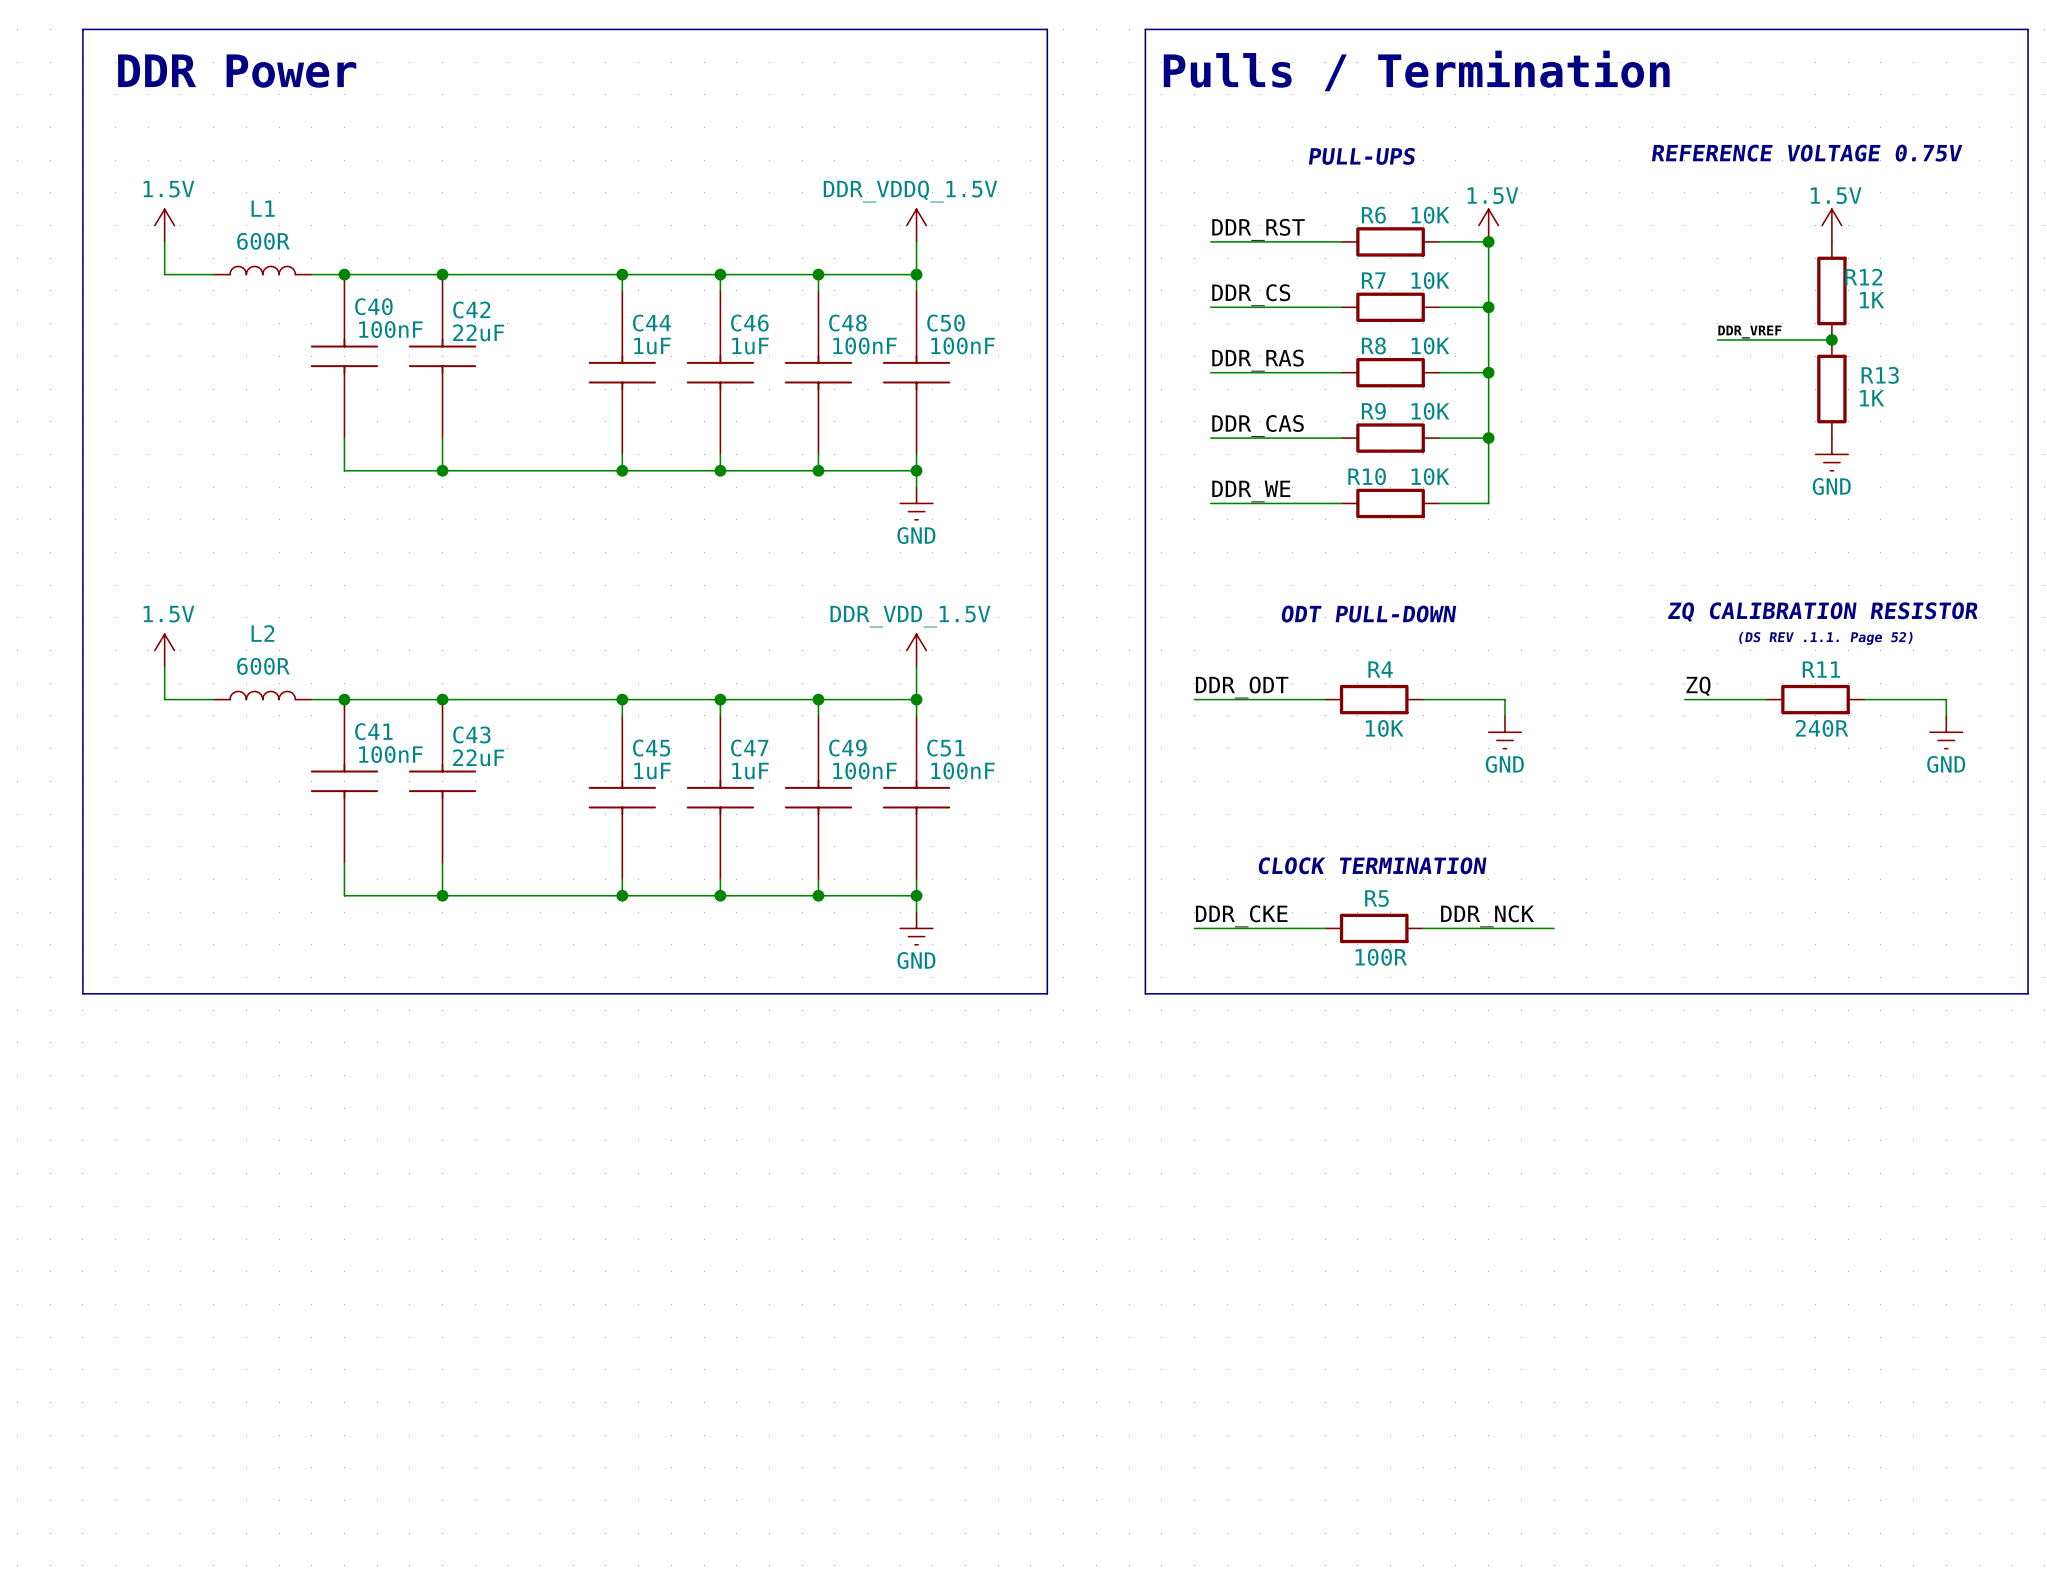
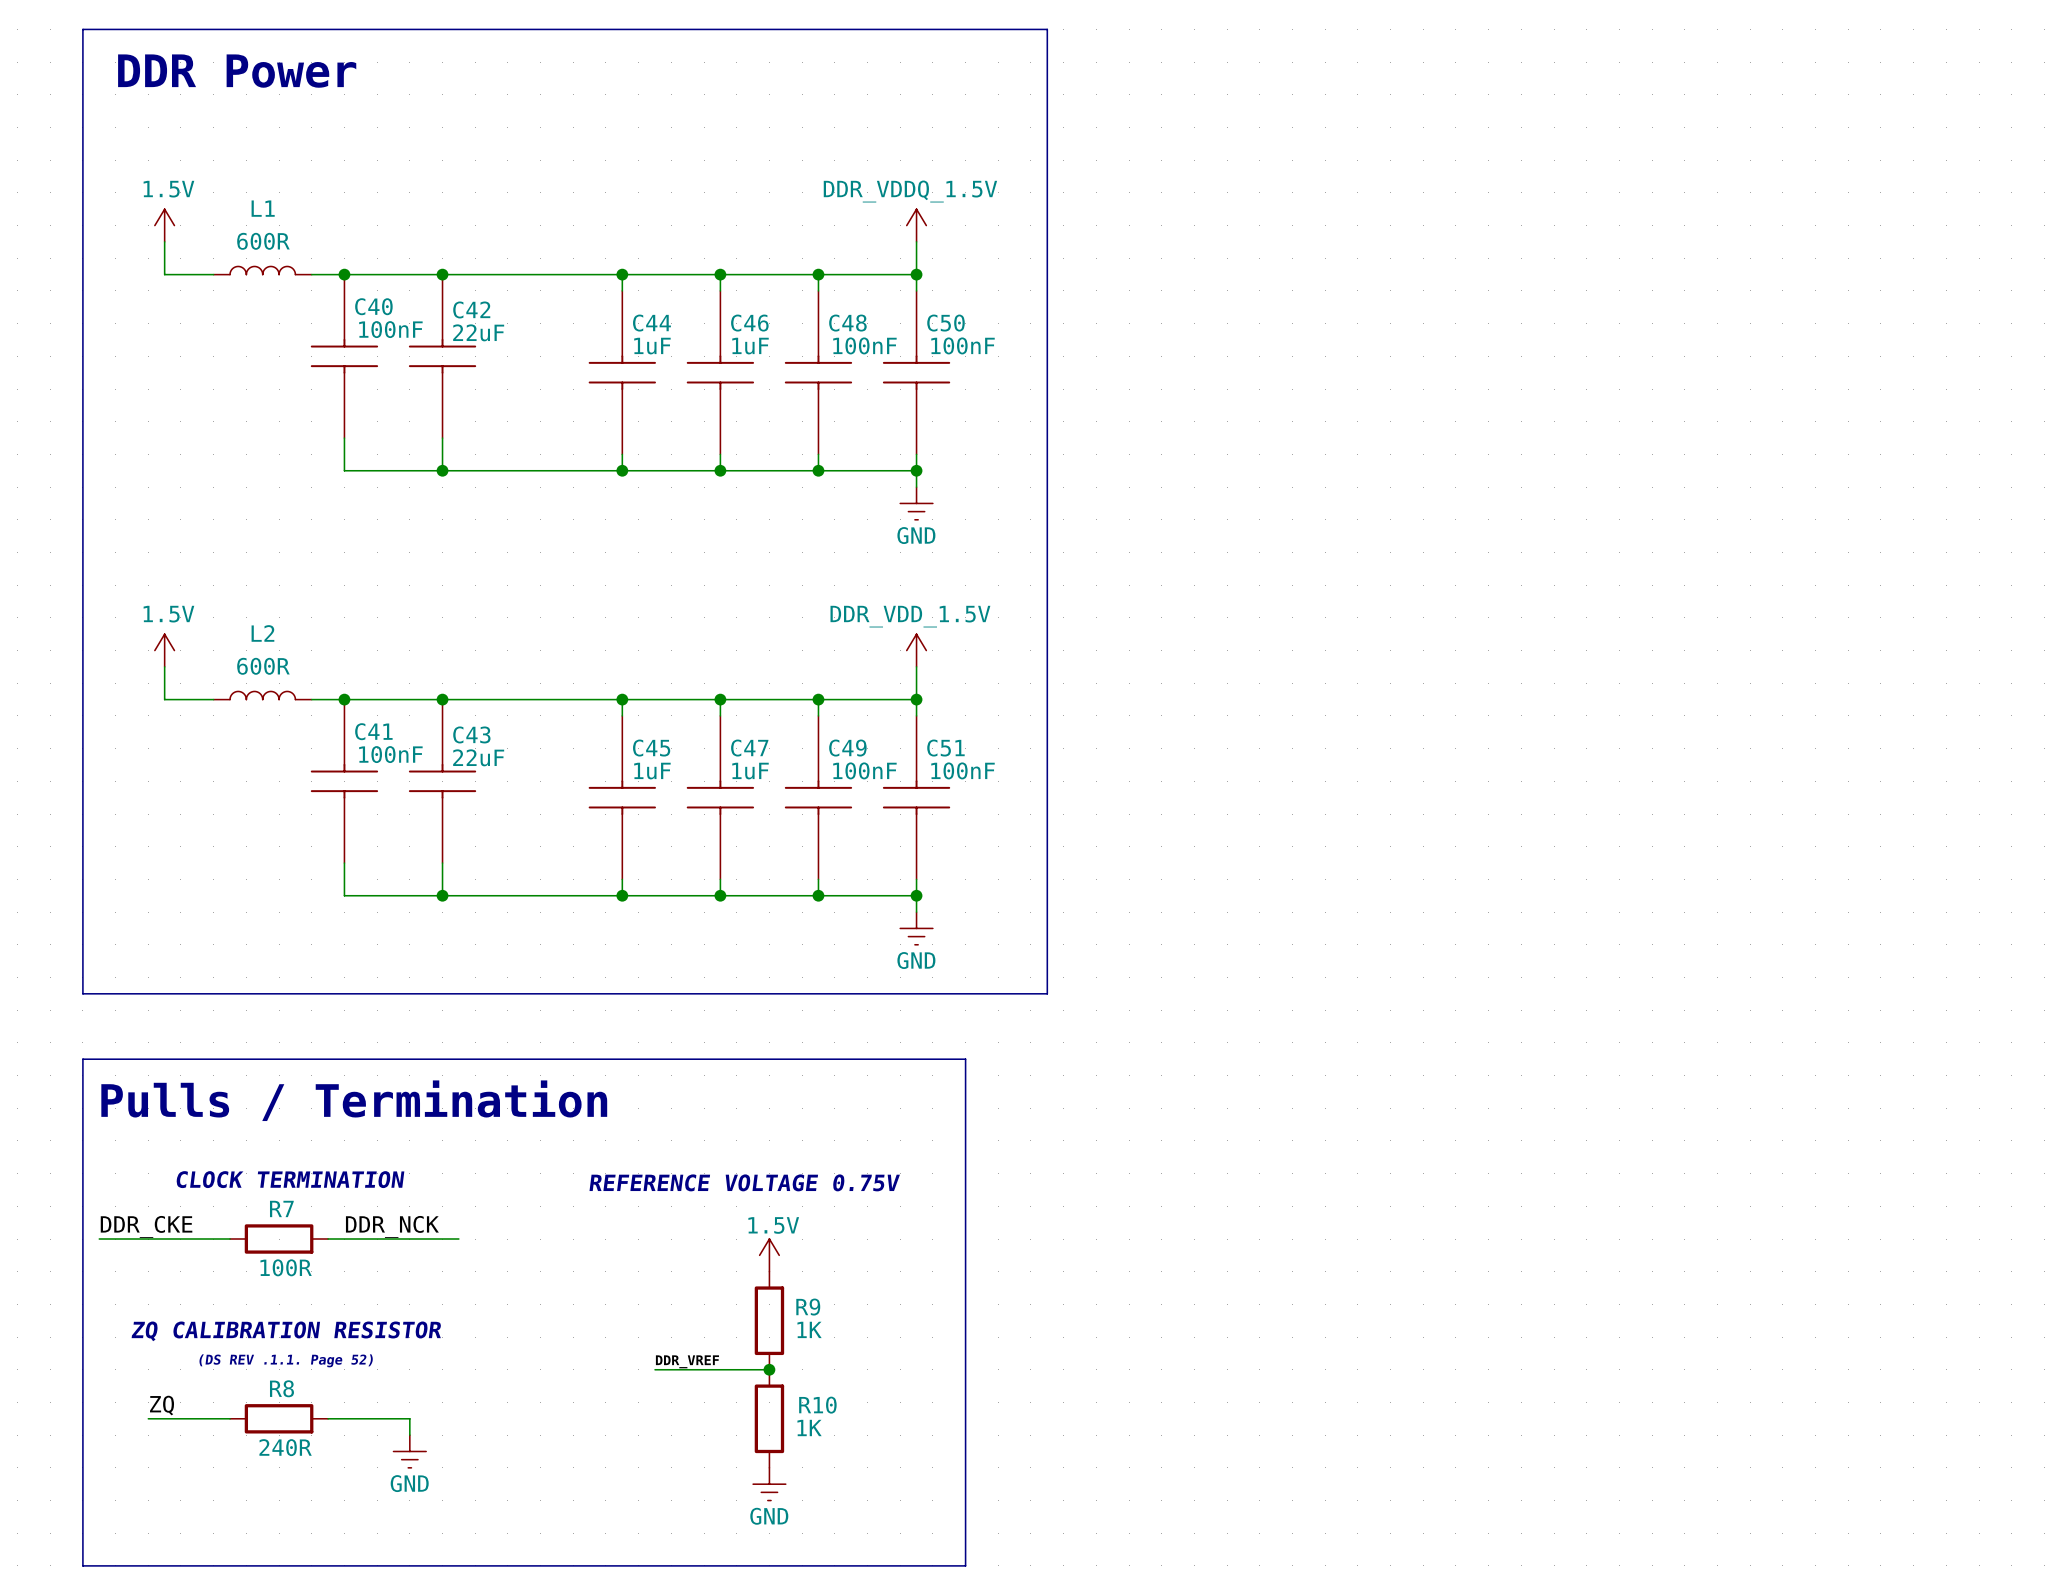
line: (1145, 29) (2028, 29) (2028, 993) (1145, 993) (1145, 29) -> none
text: Pulls / Termination (1416, 70) -> none
text: REFERENCE VOLTAGE 0.75V (1807, 153) -> none
text: PULL-UPS (1361, 156) -> none
power symbol: 1.5V (1488, 225) -> none
power symbol: 1.5V (1831, 225) -> none
label: DDR_RST (1258, 229) -> none
wire: (1210, 241) (1341, 241) -> none
R6: 10K (1390, 241) -> none
wire: (1439, 241) (1488, 241) (1488, 503) (1439, 503) -> none
junction: (1488, 241) -> none
R7 name position: R7 (1373, 280) -> R7 (281, 1208)
R7 value: 10K (1430, 280) -> 100R (286, 1267)
R12: 1K (1831, 290) -> none
label: DDR_CS (1251, 295) -> none
wire: (1210, 307) (1341, 307) -> none
R7 position: (1390, 307) -> (279, 1239)
wire: (1439, 307) (1488, 307) -> none
junction: (1488, 307) -> none
label: DDR_VREF (1749, 332) -> none
wire: (1717, 339) (1831, 339) -> none
junction: (1831, 339) -> none
R8 name position: R8 (1373, 345) -> R8 (281, 1388)
R8 value: 10K (1430, 345) -> 240R (285, 1447)
label: DDR_RAS (1258, 360) -> none
wire: (1210, 372) (1341, 372) -> none
R8 position: (1390, 372) -> (279, 1418)
wire: (1439, 372) (1488, 372) -> none
junction: (1488, 372) -> none
R13: 1K (1831, 389) -> none
R9 value: 10K (1430, 411) -> 1K (809, 1329)
label: DDR_CAS (1258, 425) -> none
wire: (1210, 438) (1341, 438) -> none
R9 rotation: 0° (1390, 438) -> 90° clockwise (769, 1320)
R9 position: (1390, 438) -> (769, 1320)
wire: (1439, 438) (1488, 438) -> none
junction: (1488, 438) -> none
power symbol: GND (1831, 454) -> none
R10 value: 10K (1430, 476) -> 1K (809, 1428)
label: DDR_WE (1251, 491) -> none
wire: (1210, 503) (1341, 503) -> none
R10 rotation: 0° (1390, 503) -> 90° clockwise (769, 1418)
R10 position: (1390, 503) -> (769, 1418)
text: ZQ CALIBRATION RESISTOR (1822, 612) -> none
text: ODT PULL-DOWN (1368, 614) -> none
text: (DS REV .1.1. Page 52) (1825, 638) -> none
label: ZQ (1698, 686) -> none
label: DDR_ODT (1242, 687) -> none
wire: (1194, 699) (1325, 699) -> none
R4: 10K (1374, 699) -> none
wire: (1423, 699) (1504, 699) (1504, 715) -> none
wire: (1684, 699) (1766, 699) -> none
R11: 240R (1815, 699) -> none
wire: (1864, 699) (1946, 699) (1946, 715) -> none
power symbol: GND (1504, 732) -> none
power symbol: GND (1946, 732) -> none
text: CLOCK TERMINATION (1372, 865) -> none
label: DDR_CKE (1241, 916) -> none
label: DDR_NCK (1487, 916) -> none
wire: (1194, 928) (1325, 928) -> none
R5: 100R (1374, 928) -> none
wire: (1423, 928) (1554, 928) -> none
line: none -> (82, 1059) (82, 1565) (965, 1565) (965, 1059) (82, 1059)
text: none -> Pulls / Termination (354, 1100)
text: none -> CLOCK TERMINATION (290, 1179)
text: none -> REFERENCE VOLTAGE 0.75V (744, 1182)
label: none -> DDR_CKE (146, 1226)
label: none -> DDR_NCK (392, 1226)
wire: none -> (99, 1239) (230, 1239)
wire: none -> (328, 1239) (458, 1239)
power symbol: none -> 1.5V (769, 1255)
text: none -> ZQ CALIBRATION RESISTOR (286, 1331)
text: none -> (DS REV .1.1. Page 52) (286, 1360)
label: none -> DDR_VREF (687, 1361)
wire: none -> (655, 1369) (769, 1369)
junction: none -> (769, 1369)
label: none -> ZQ (162, 1405)
wire: none -> (148, 1418) (230, 1418)
wire: none -> (328, 1418) (409, 1418) (409, 1435)
power symbol: none -> GND (409, 1451)
power symbol: none -> GND (769, 1484)

